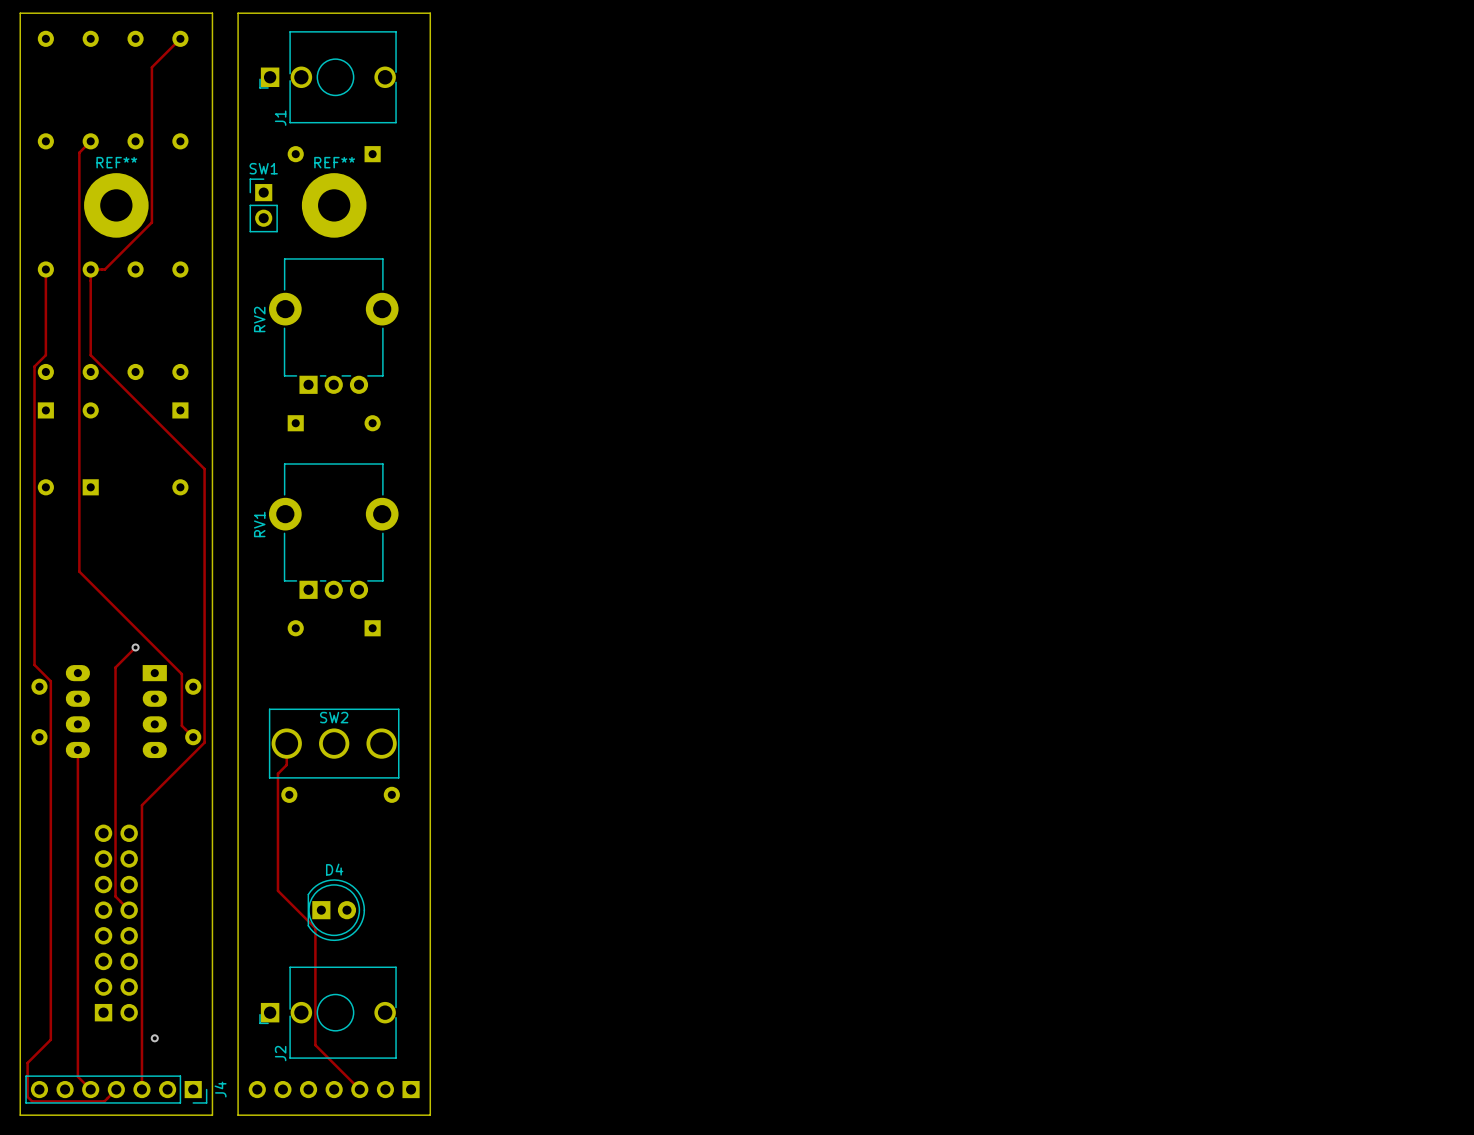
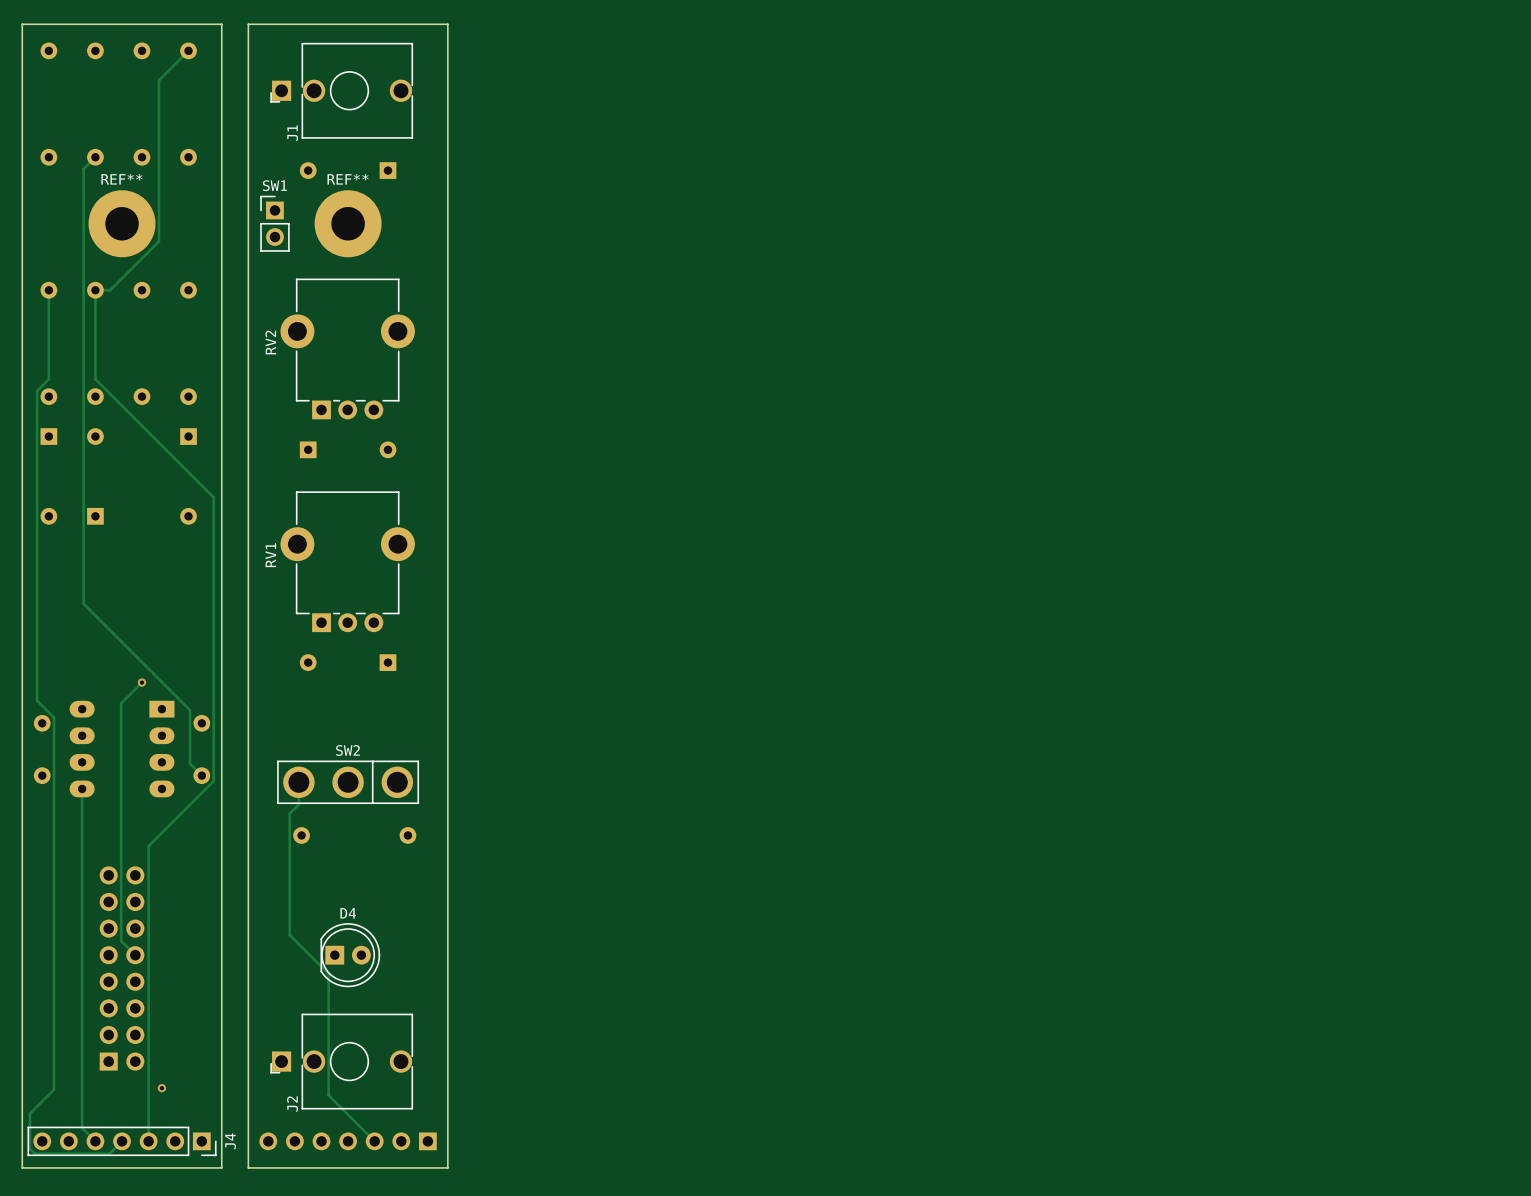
SW2 footprint: [269, 708, 400, 779] -> [277, 760, 419, 804]

